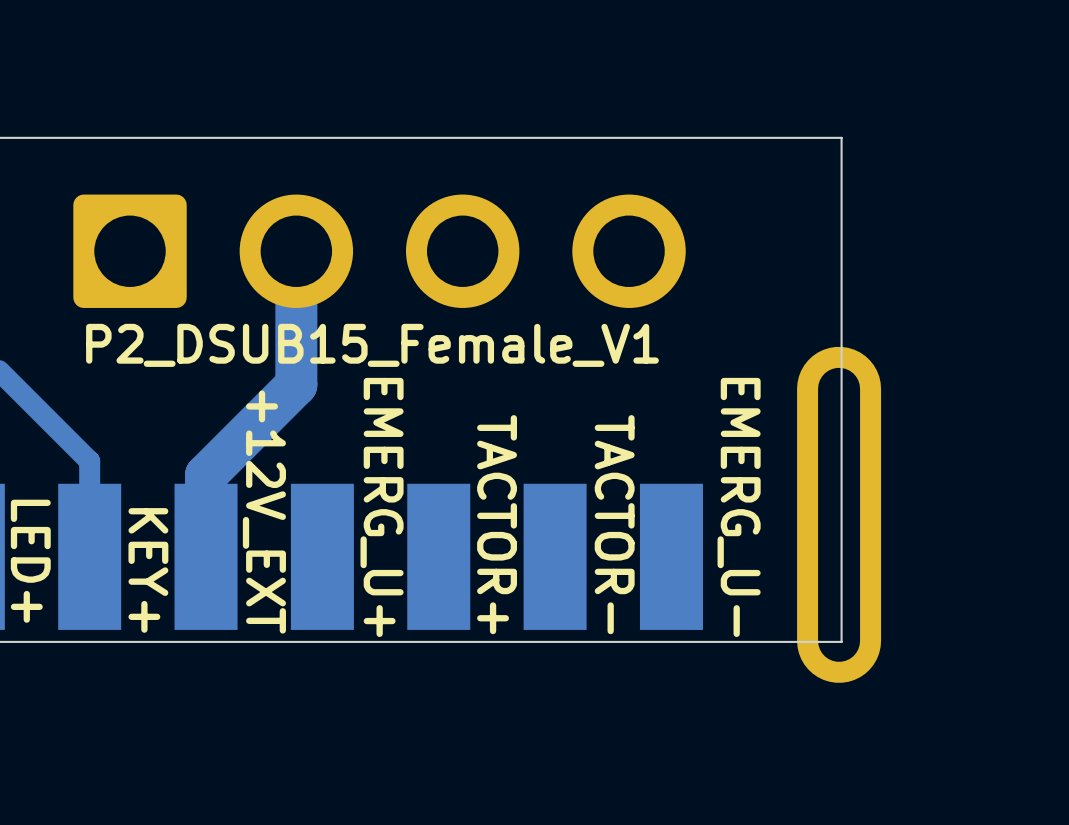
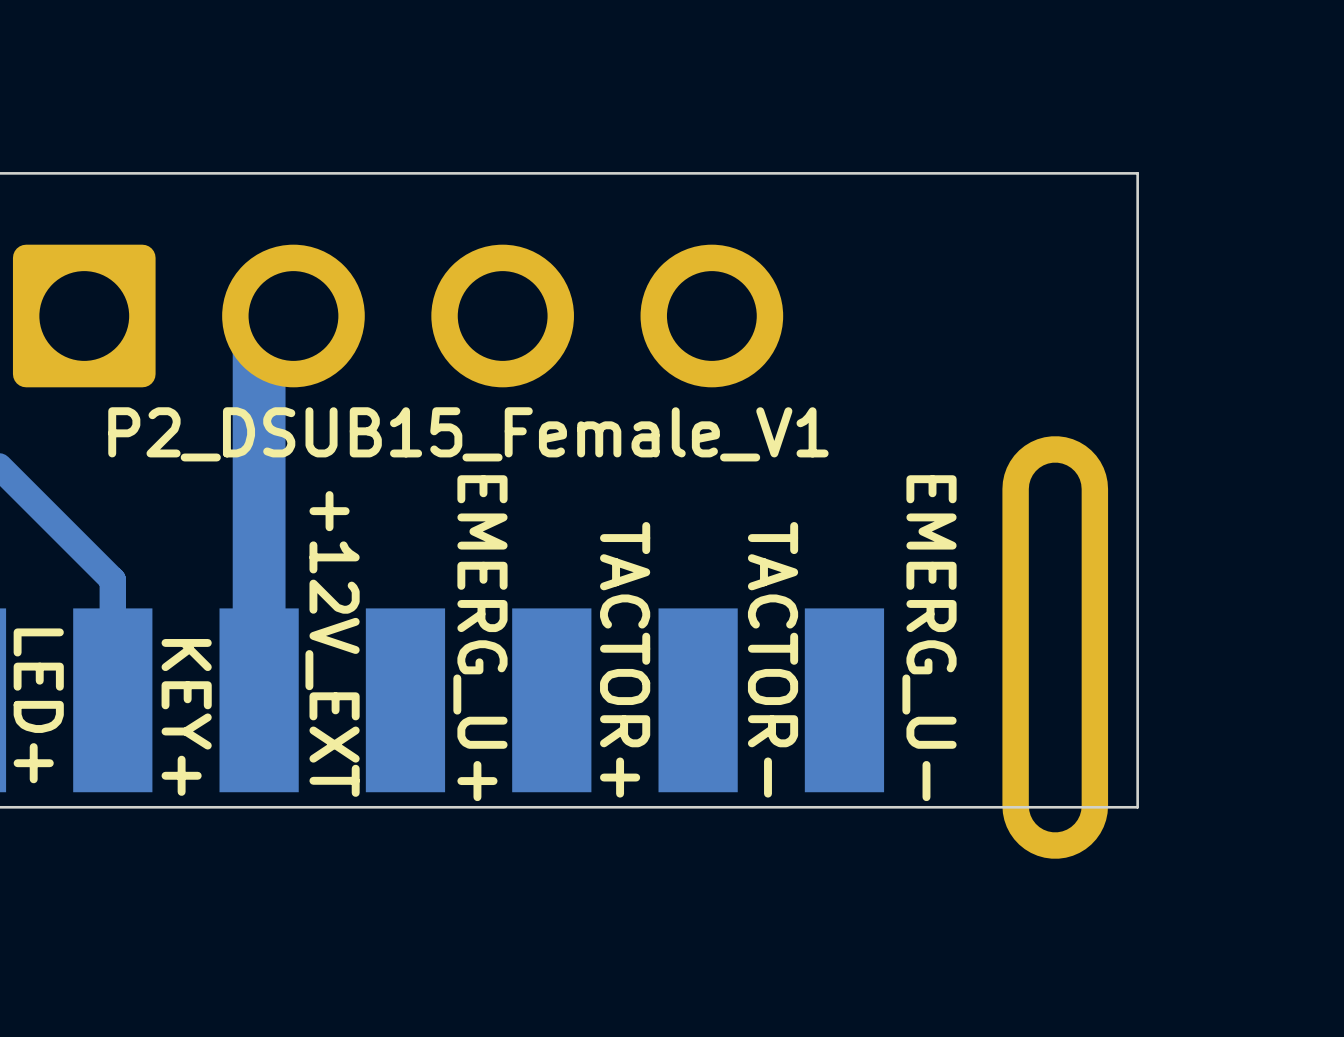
board edge: (841, 137) (841, 641) -> (1058, 173) (1137, 173) (1137, 807) (1058, 807)
track: (296, 251) (296, 384) (206, 475) -> (293, 316) (259, 350) (259, 597)
part position: (379, 251) -> (398, 316)

